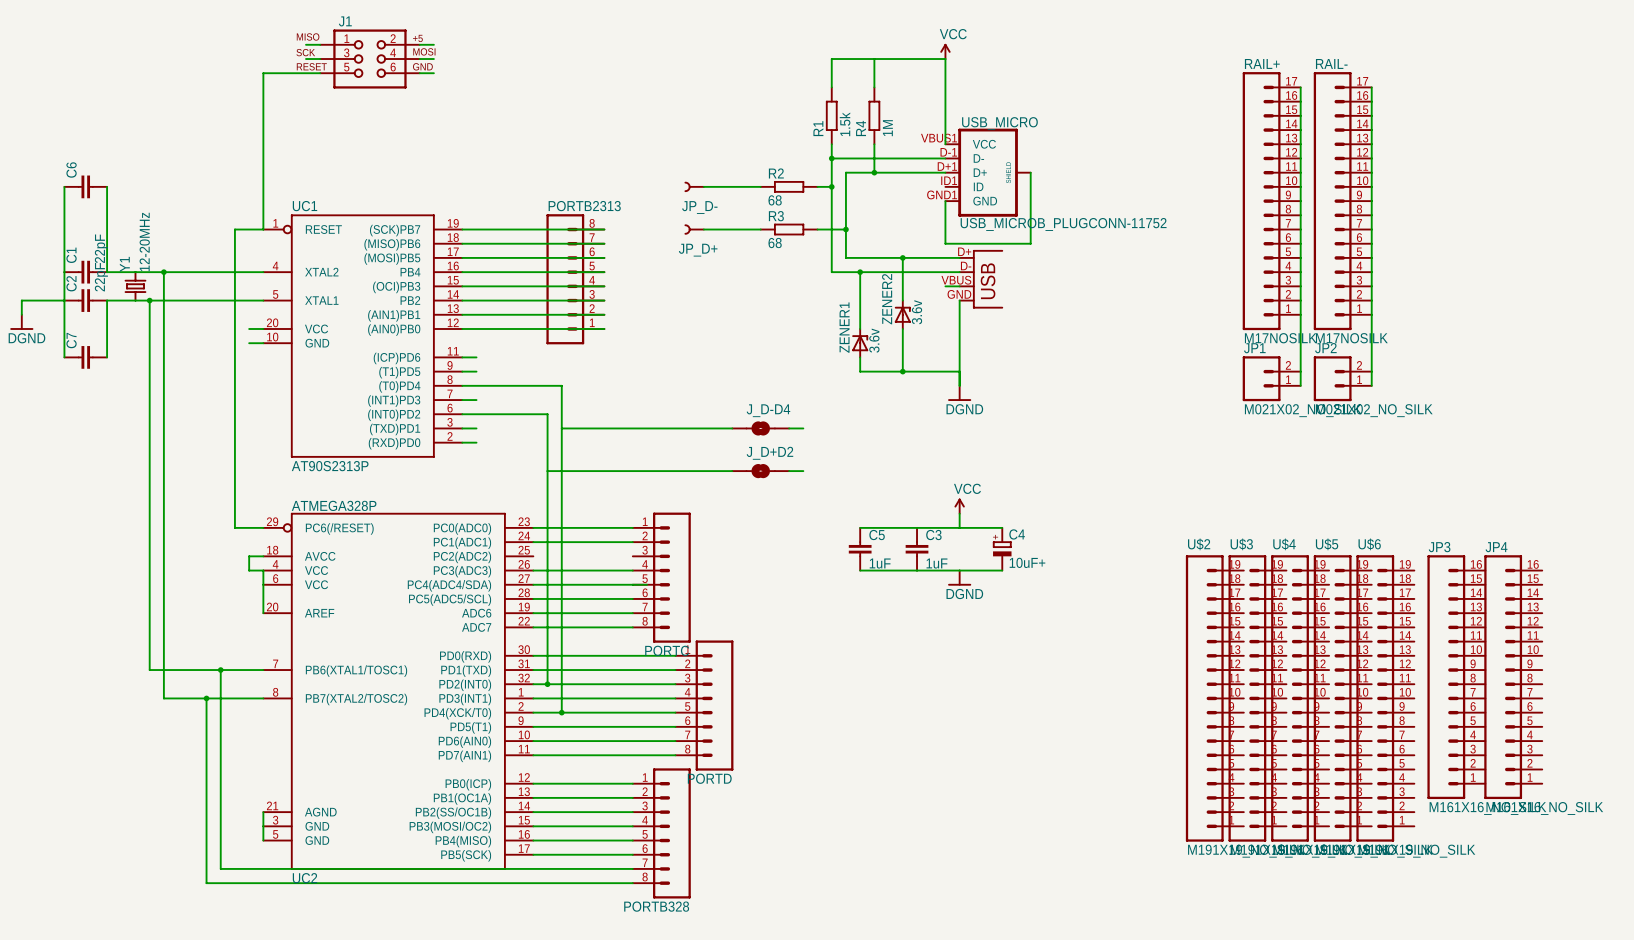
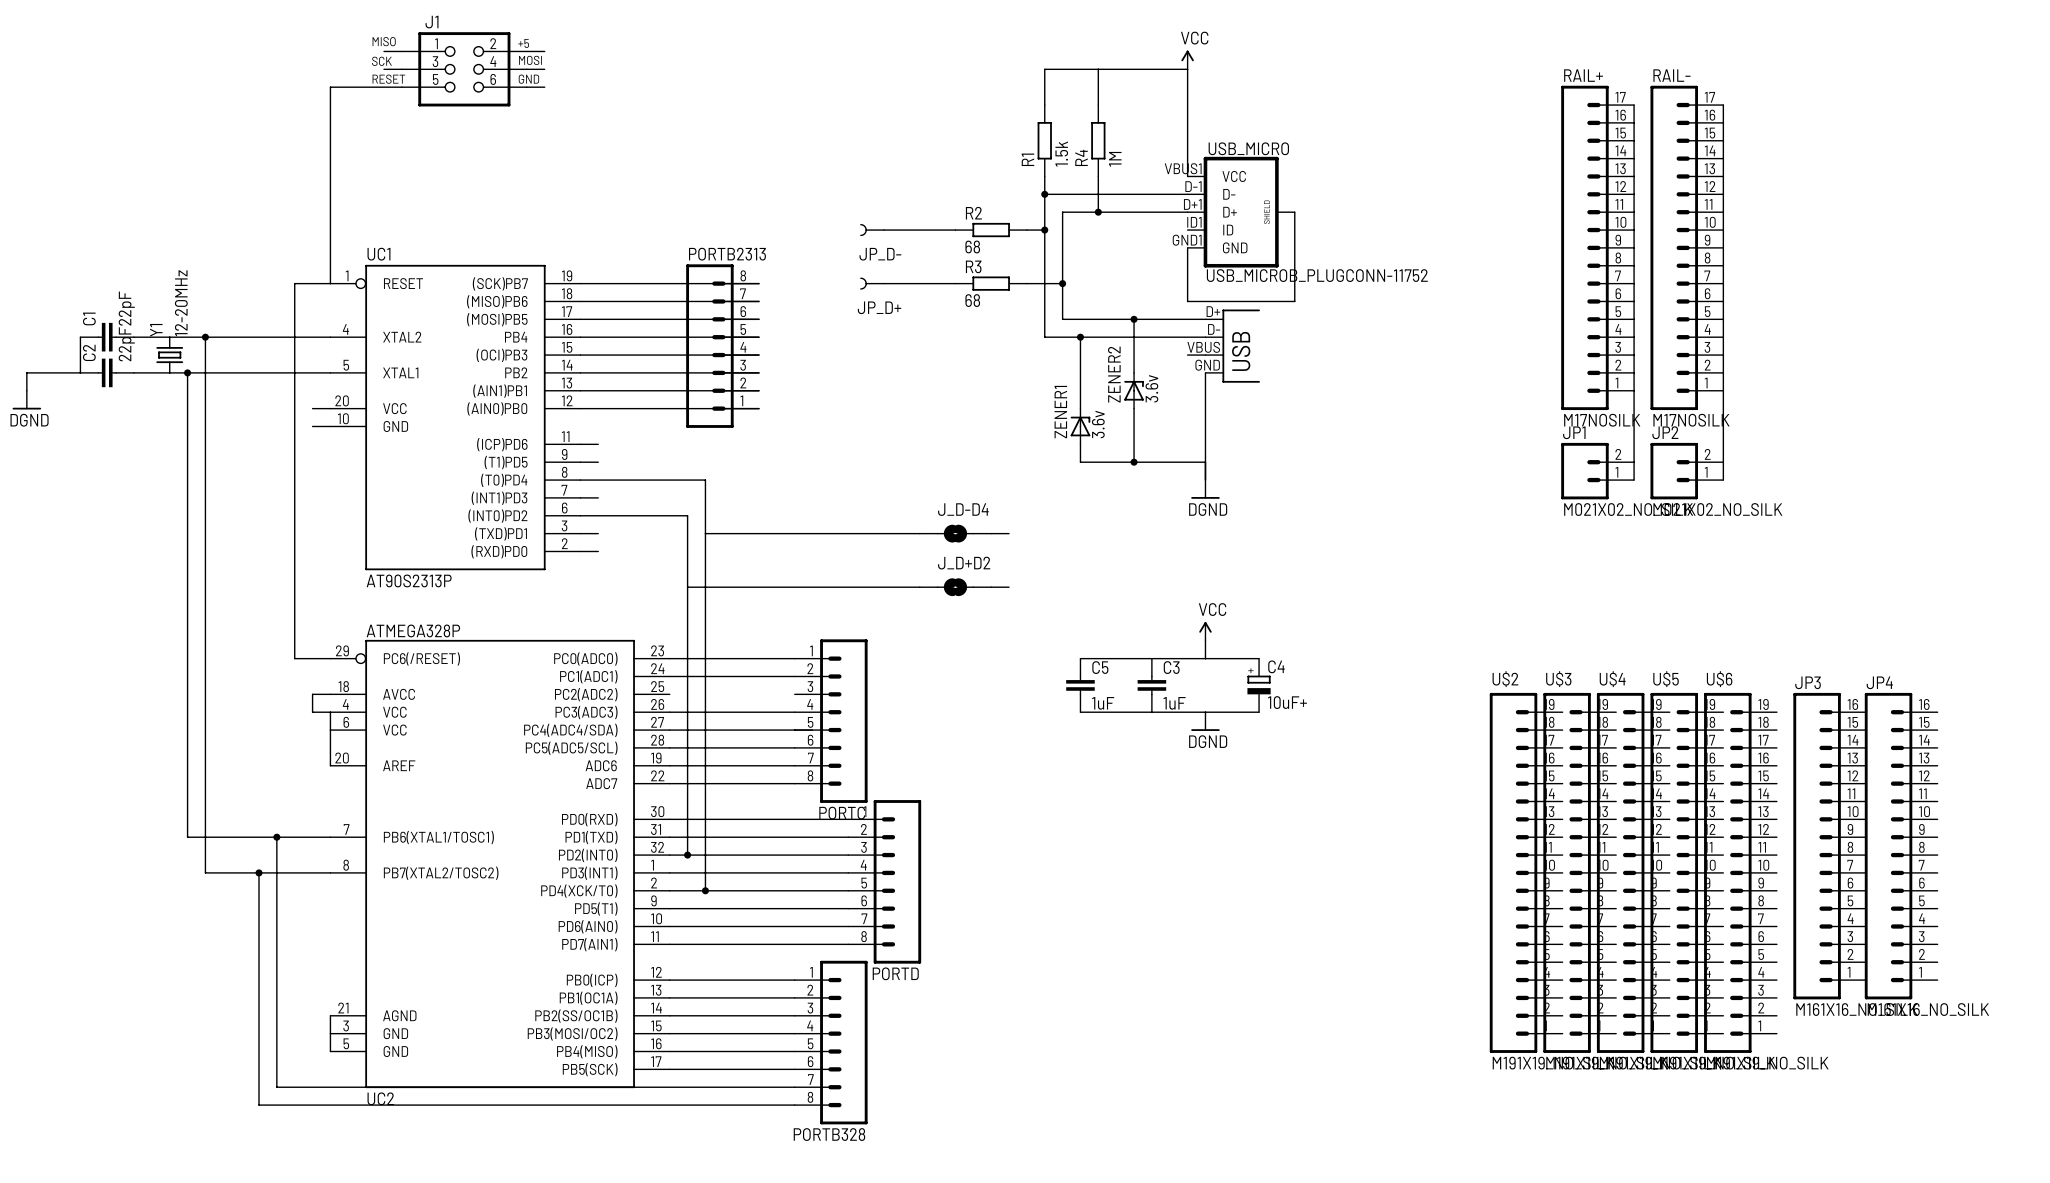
wire: (64, 186) (64, 272) -> none
C6: (85, 186) -> none
wire: (107, 186) (107, 272) -> none
wire: (64, 300) (64, 357) -> none
wire: (107, 300) (107, 357) -> none
C7: (85, 357) -> none

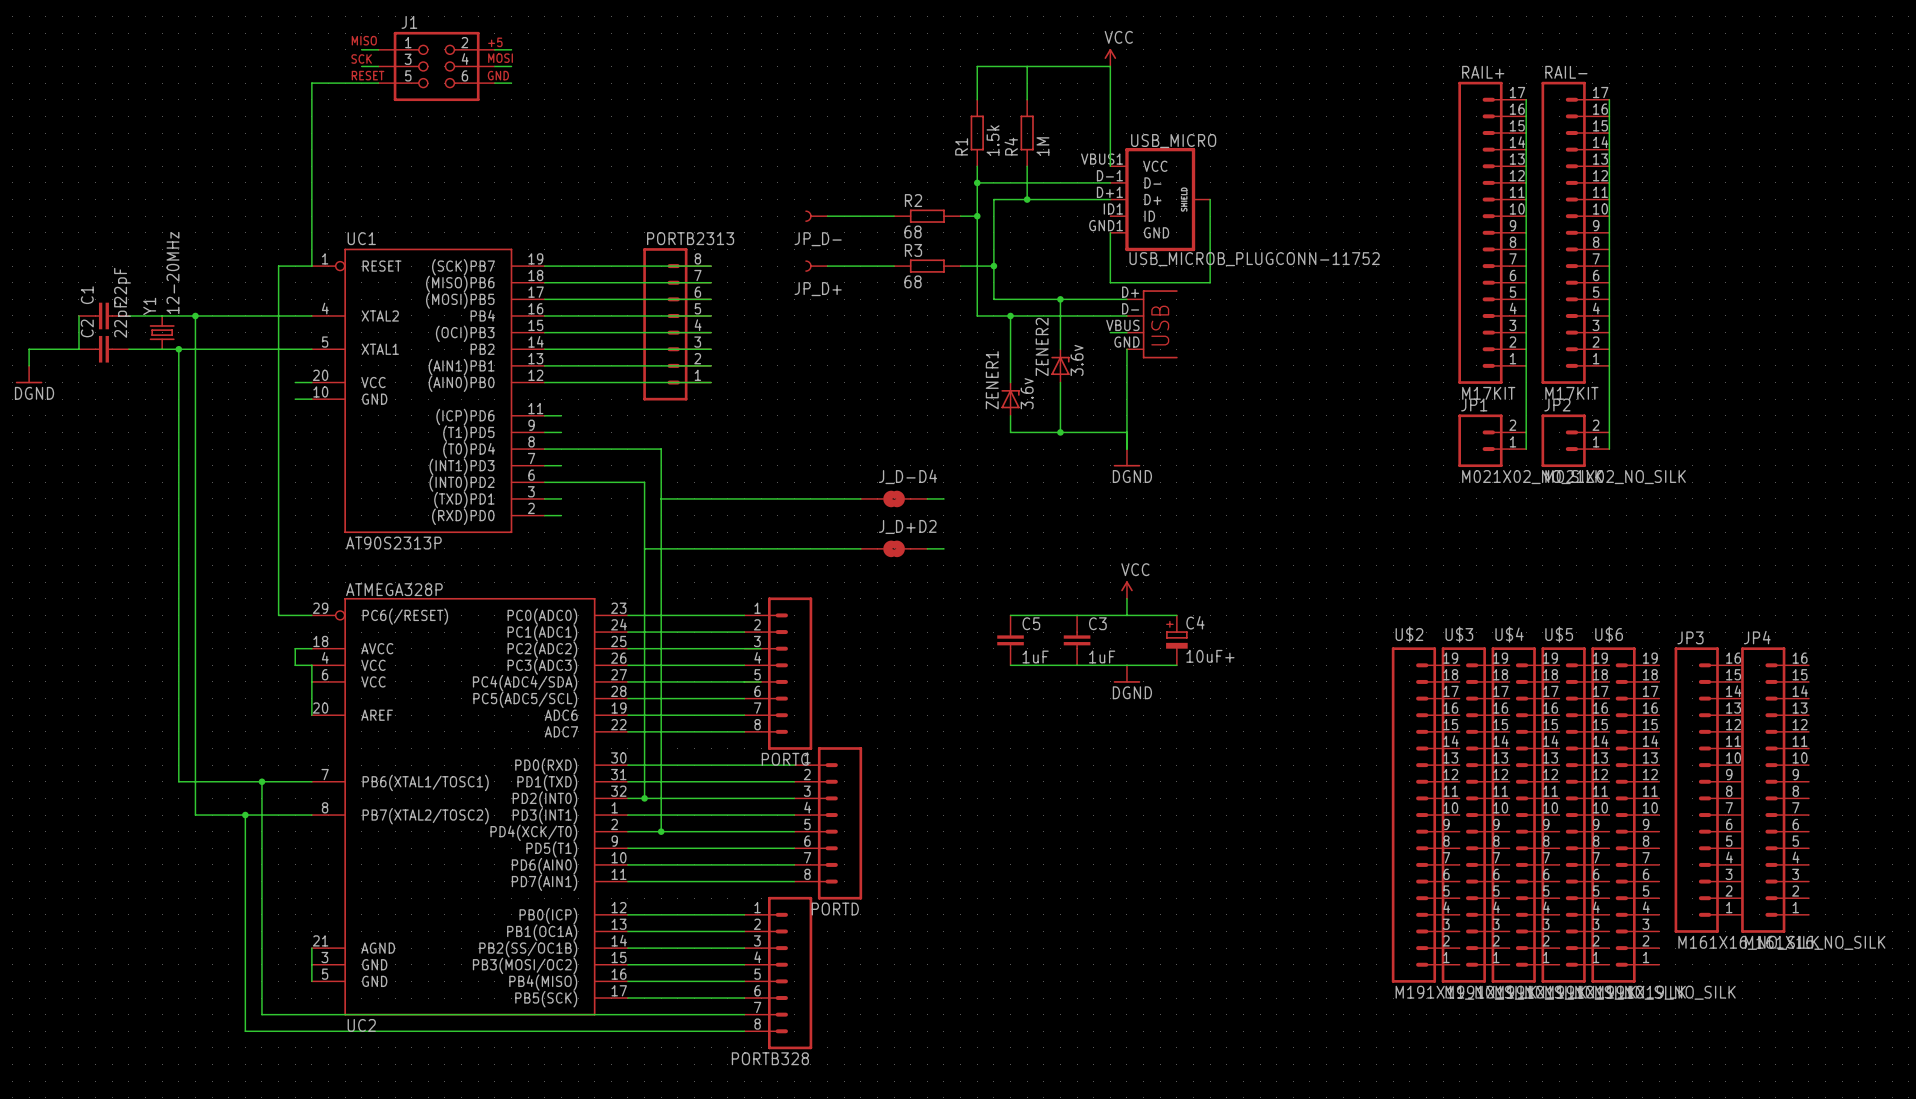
RAIL+ value: M17NOSILK (1602, 420) -> M17KIT (1488, 393)
RAIL- value: M17NOSILK (1691, 420) -> M17KIT (1571, 393)
wire: none -> (627, 648) (761, 648)

